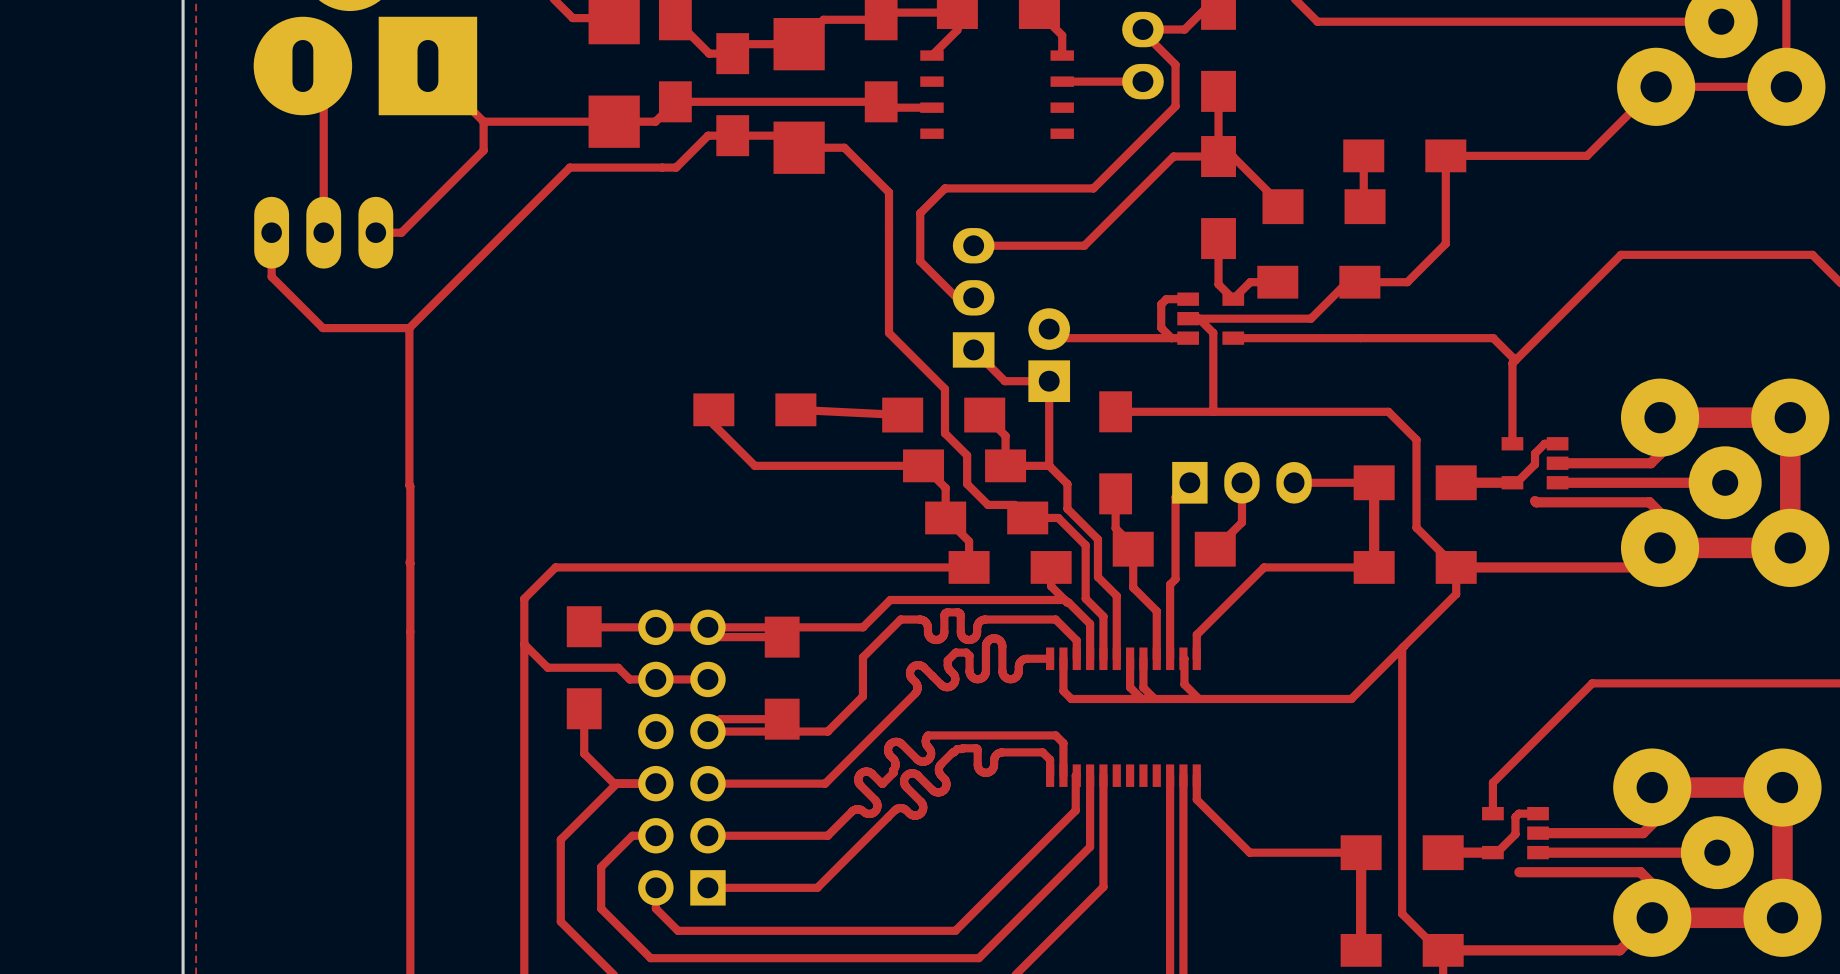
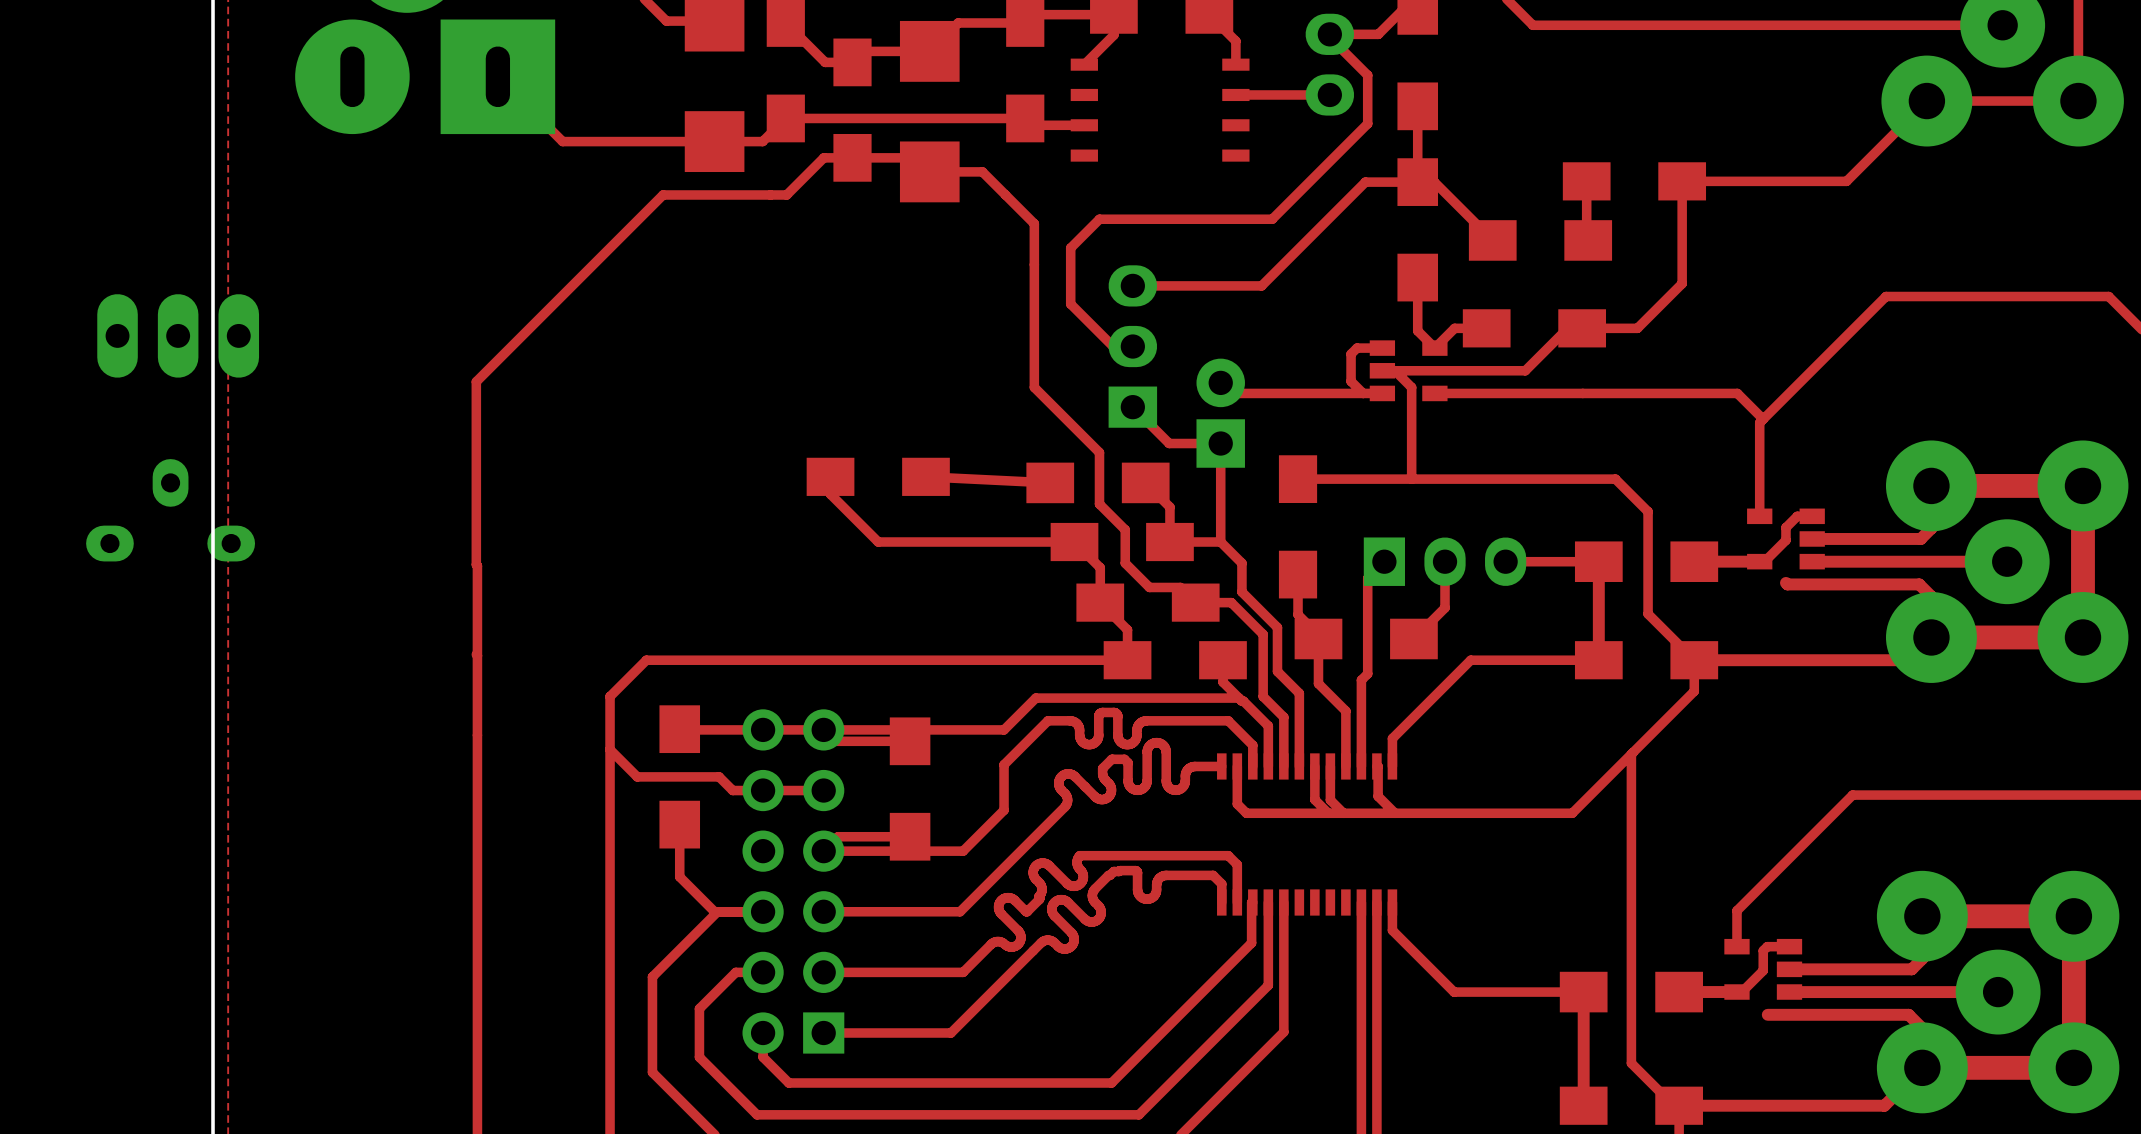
top track: (302, 66) (323, 86) (323, 232) -> none
top track: (483, 121) (483, 150) (401, 232) (375, 232) -> none
top track: (271, 232) (271, 276) (322, 328) (409, 328) -> none
part position: (323, 232) -> (178, 335)
part: none -> (170, 510)

